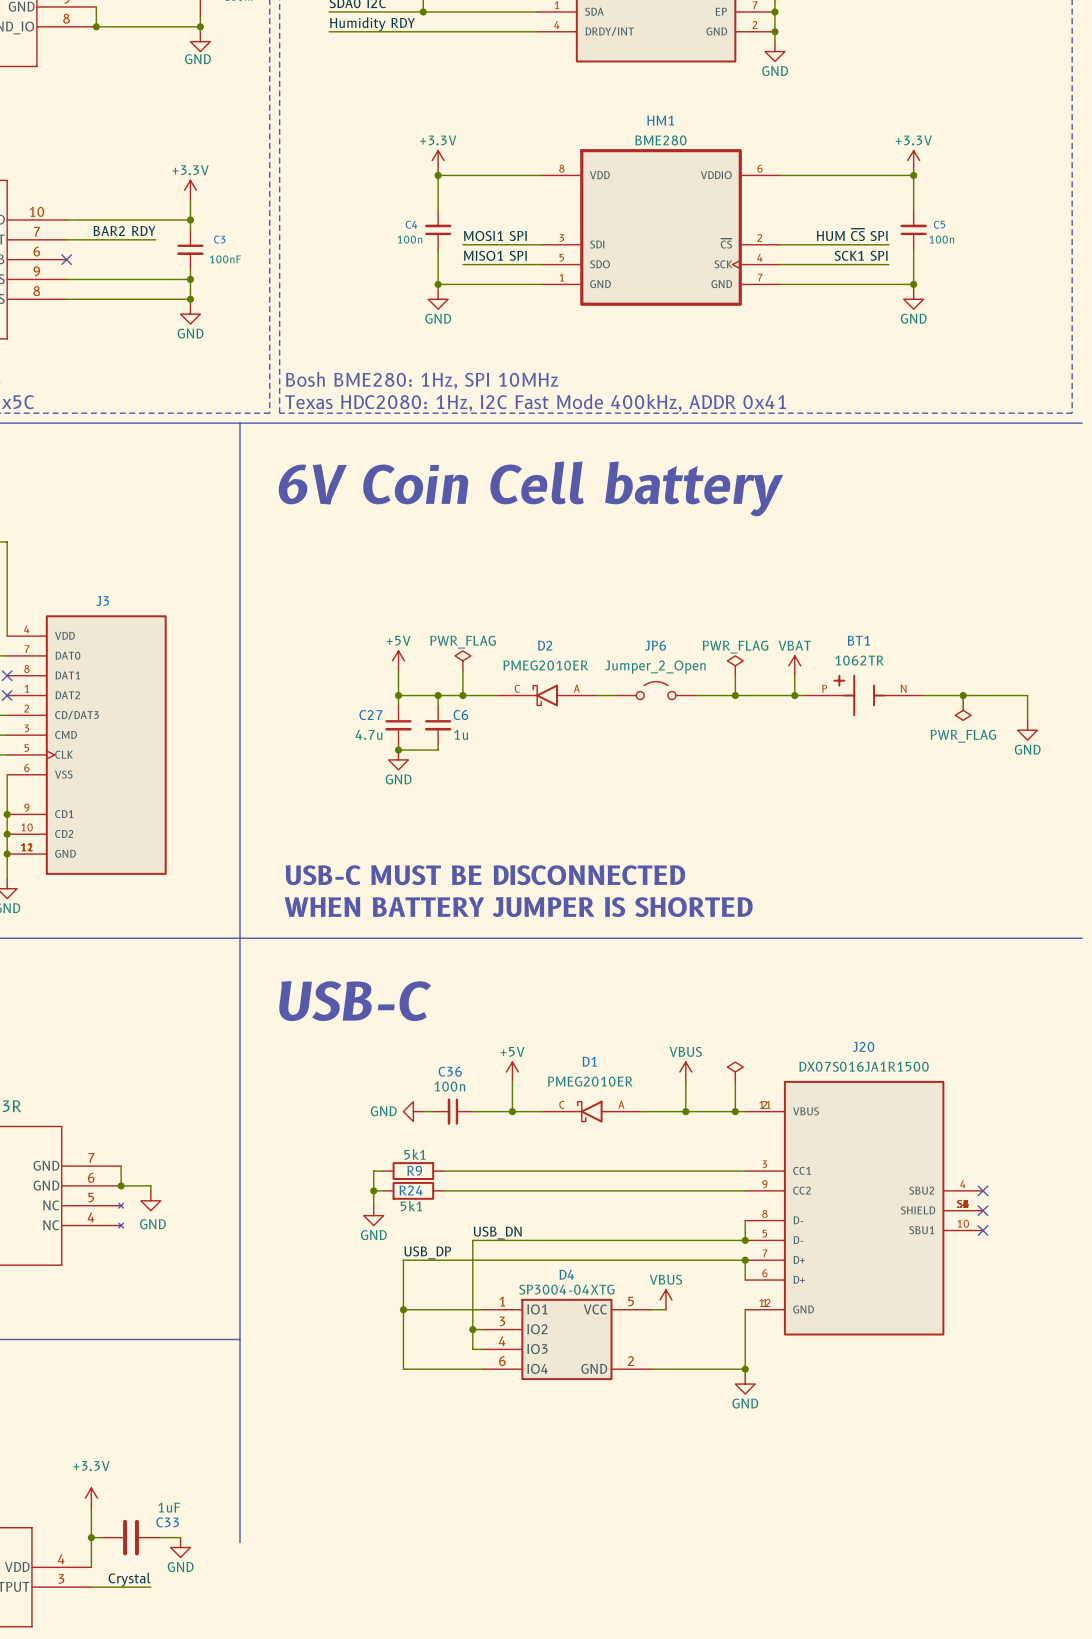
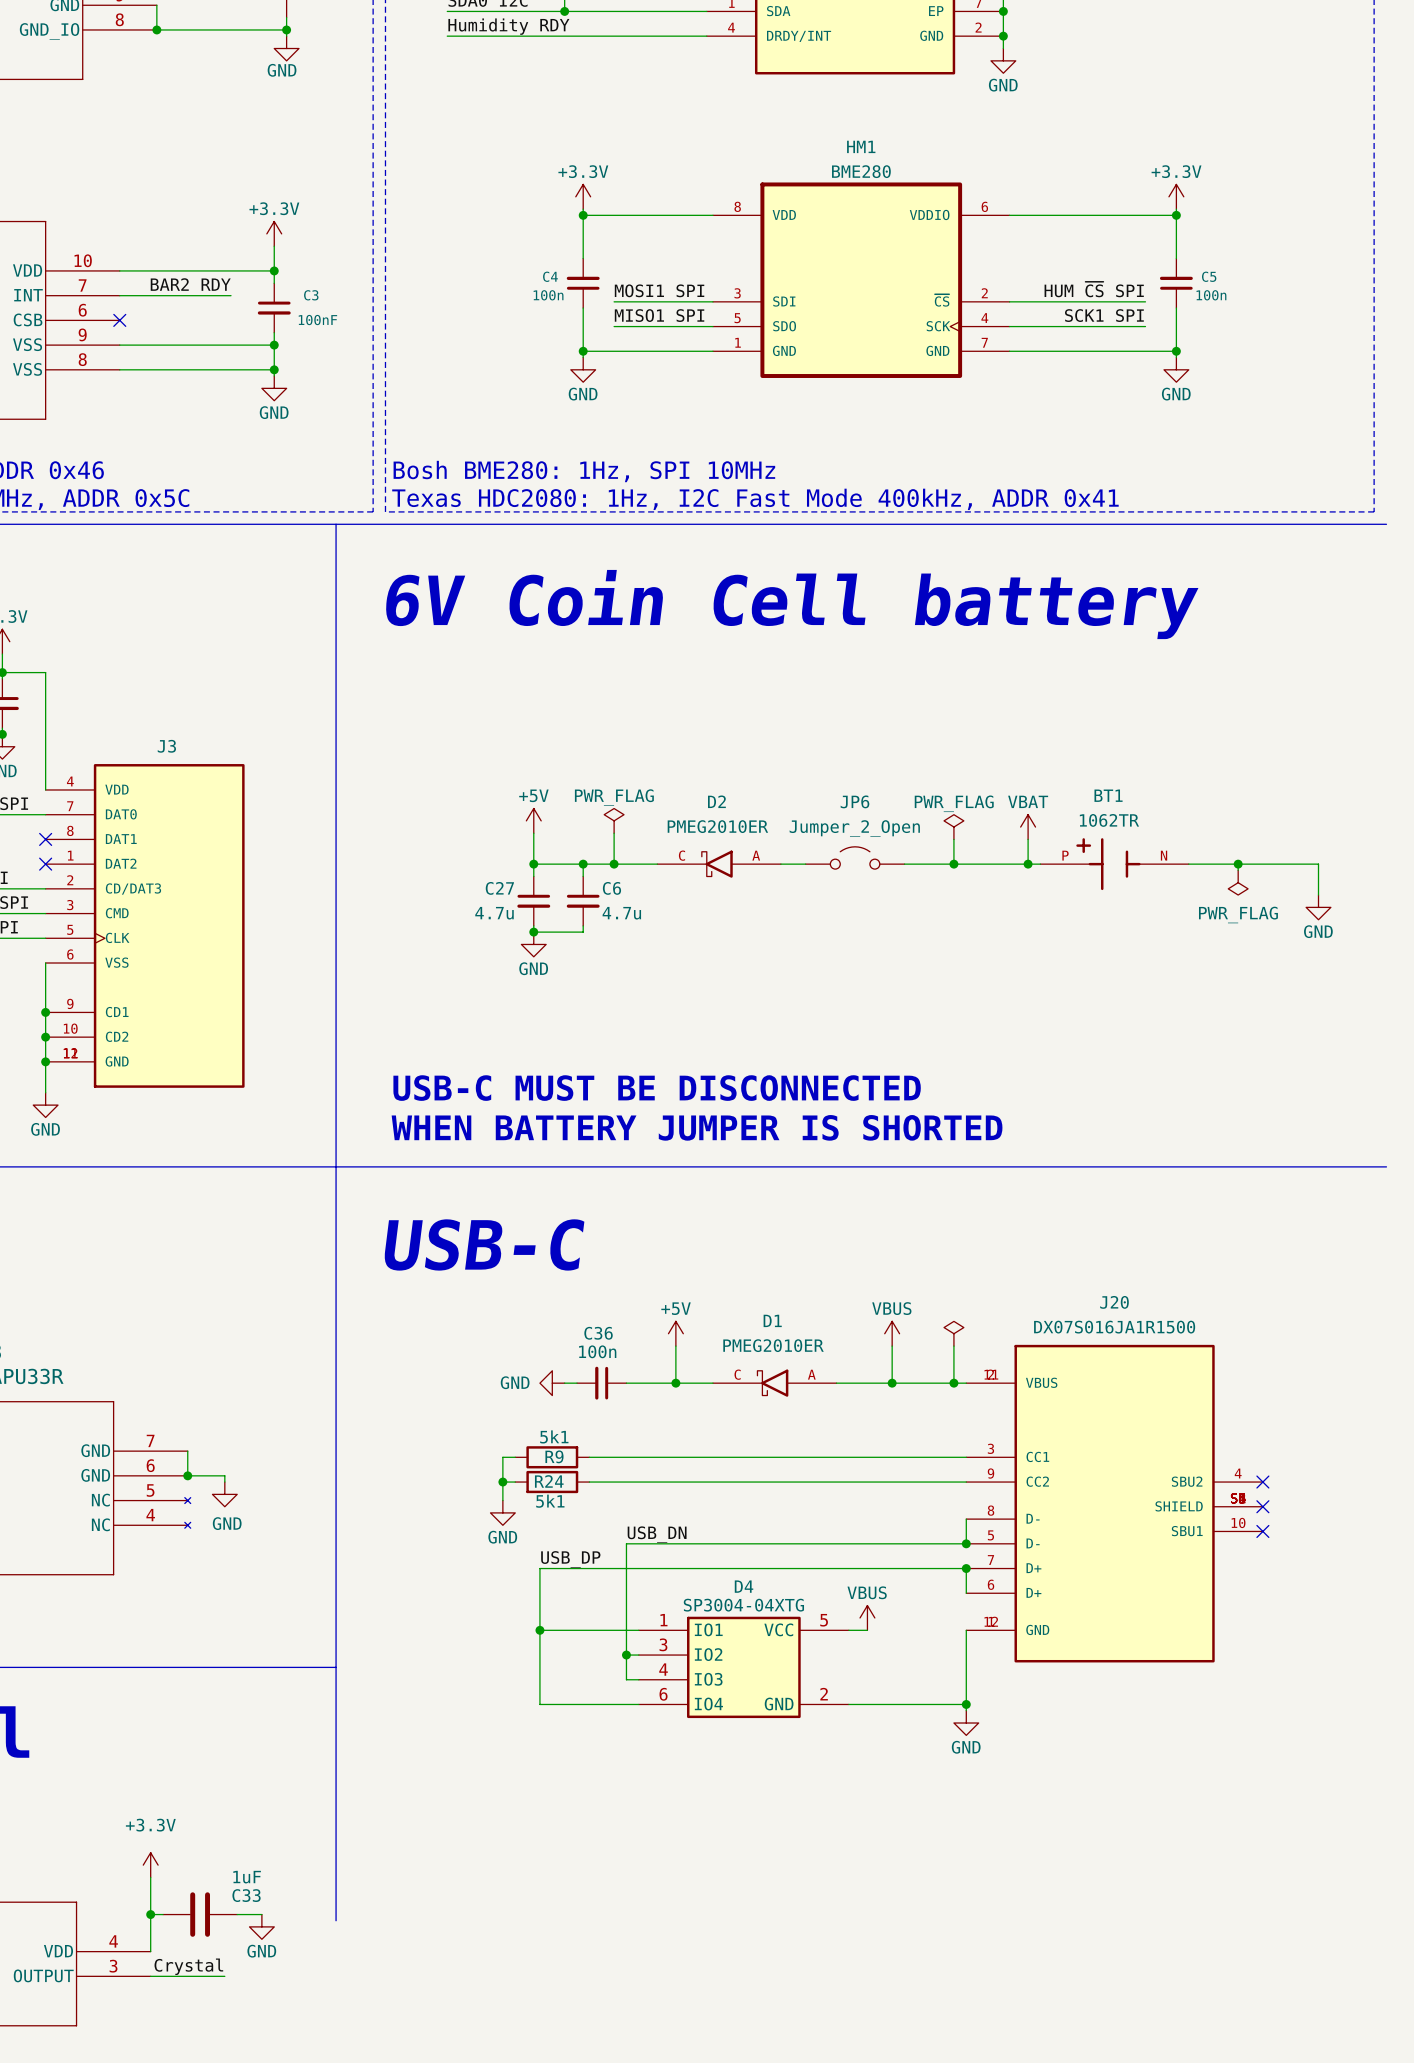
C6 value: 1u (461, 734) -> 4.7u (621, 913)

